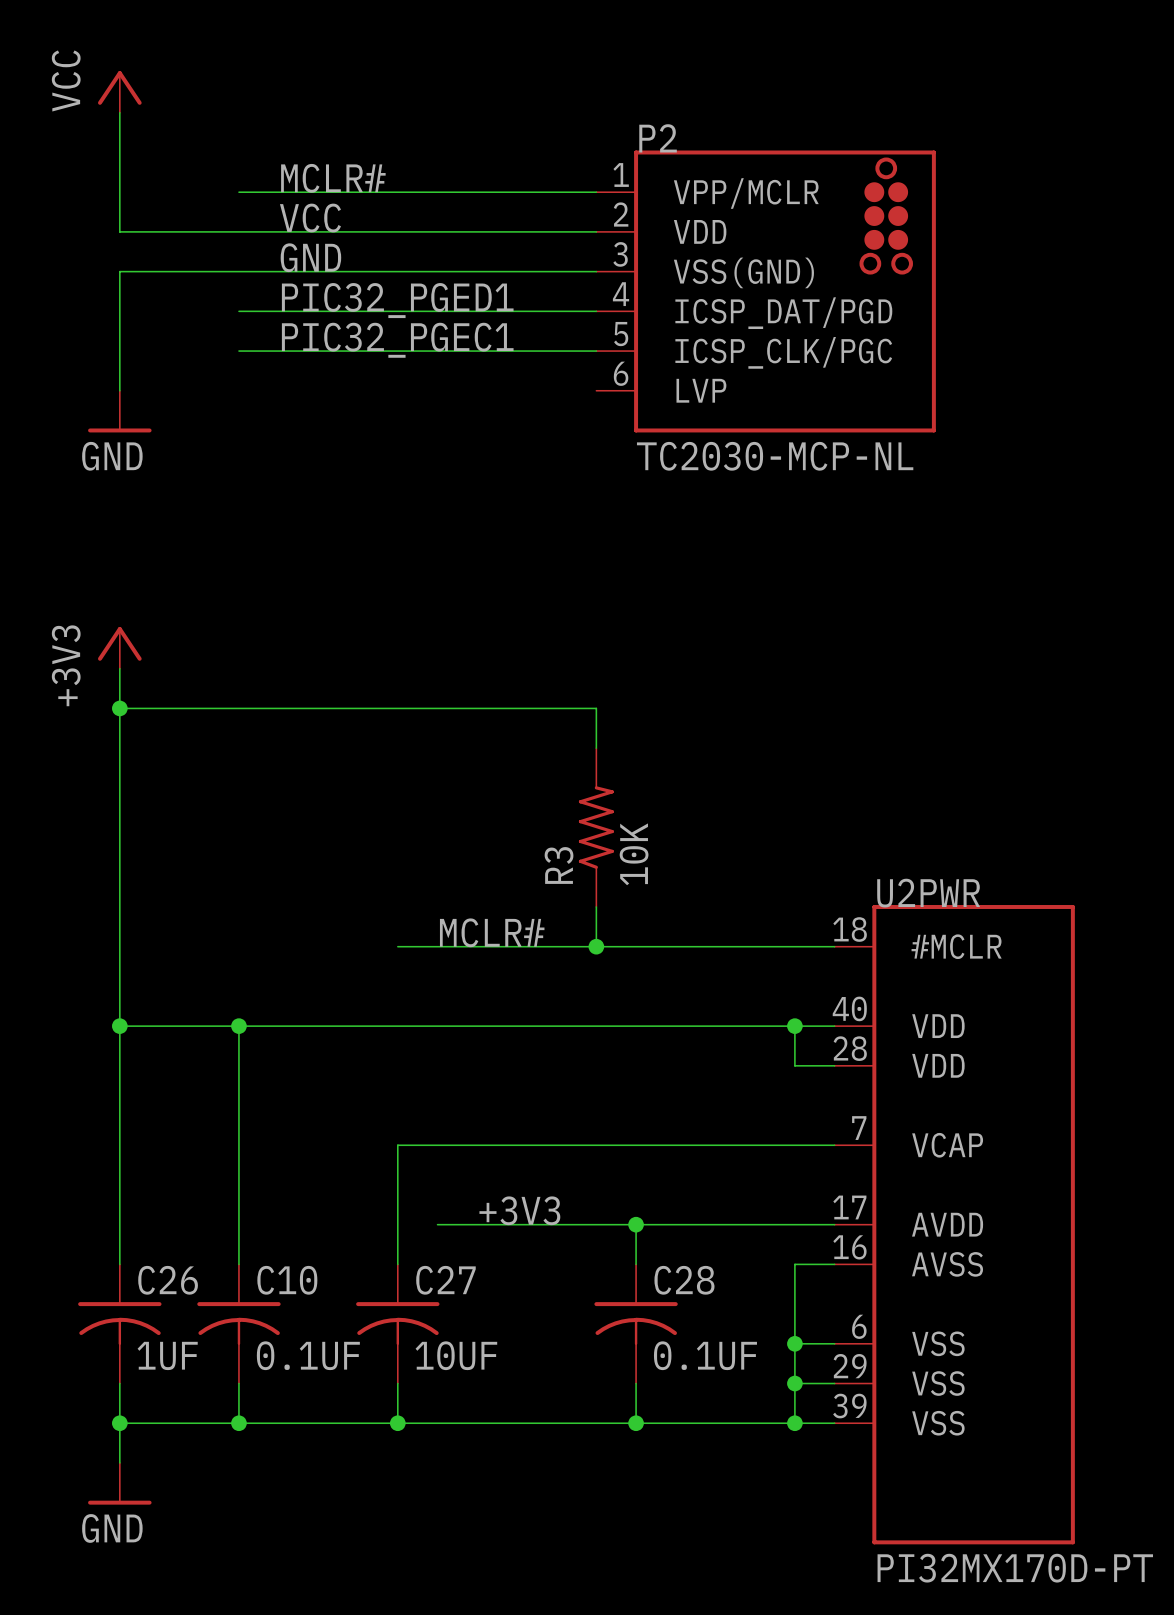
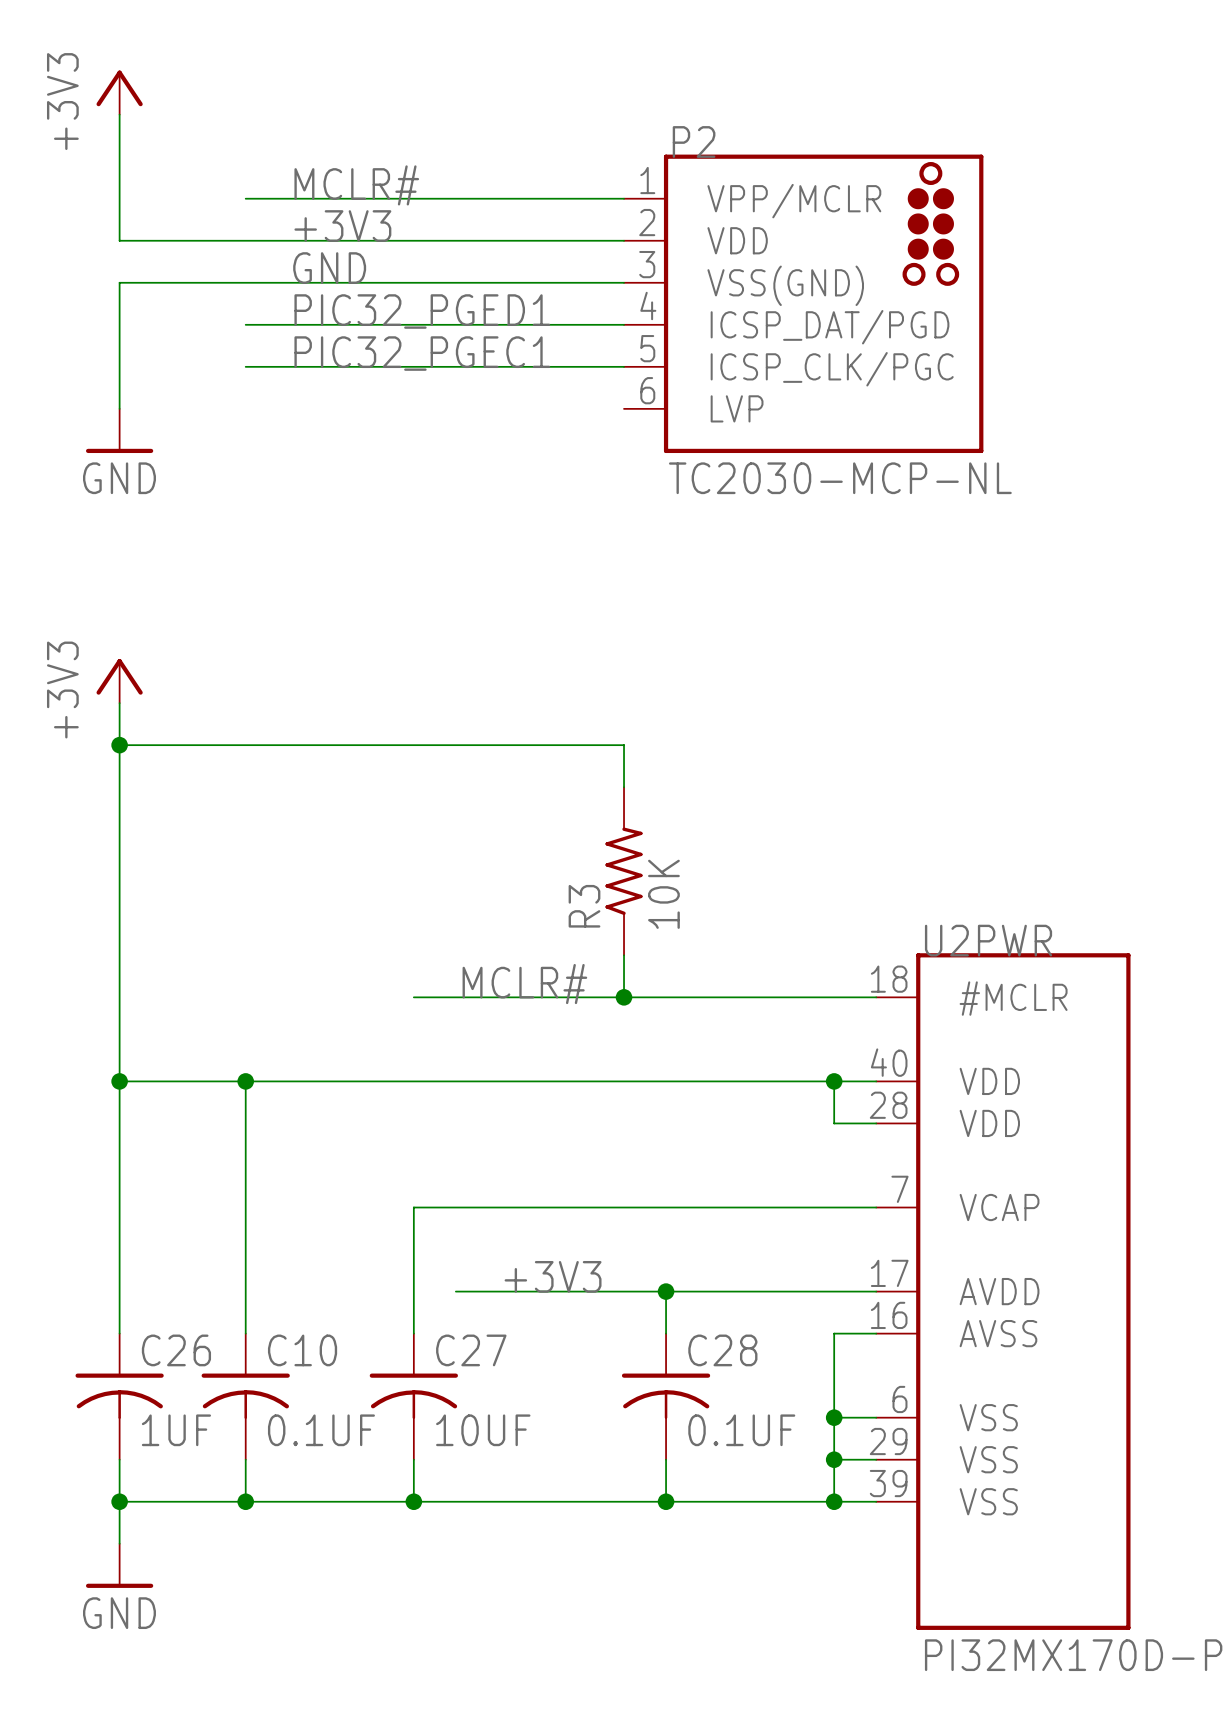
power symbol: VCC (119, 91) -> +3V3 (119, 92)
label: VCC (310, 218) -> +3V3 (342, 226)

